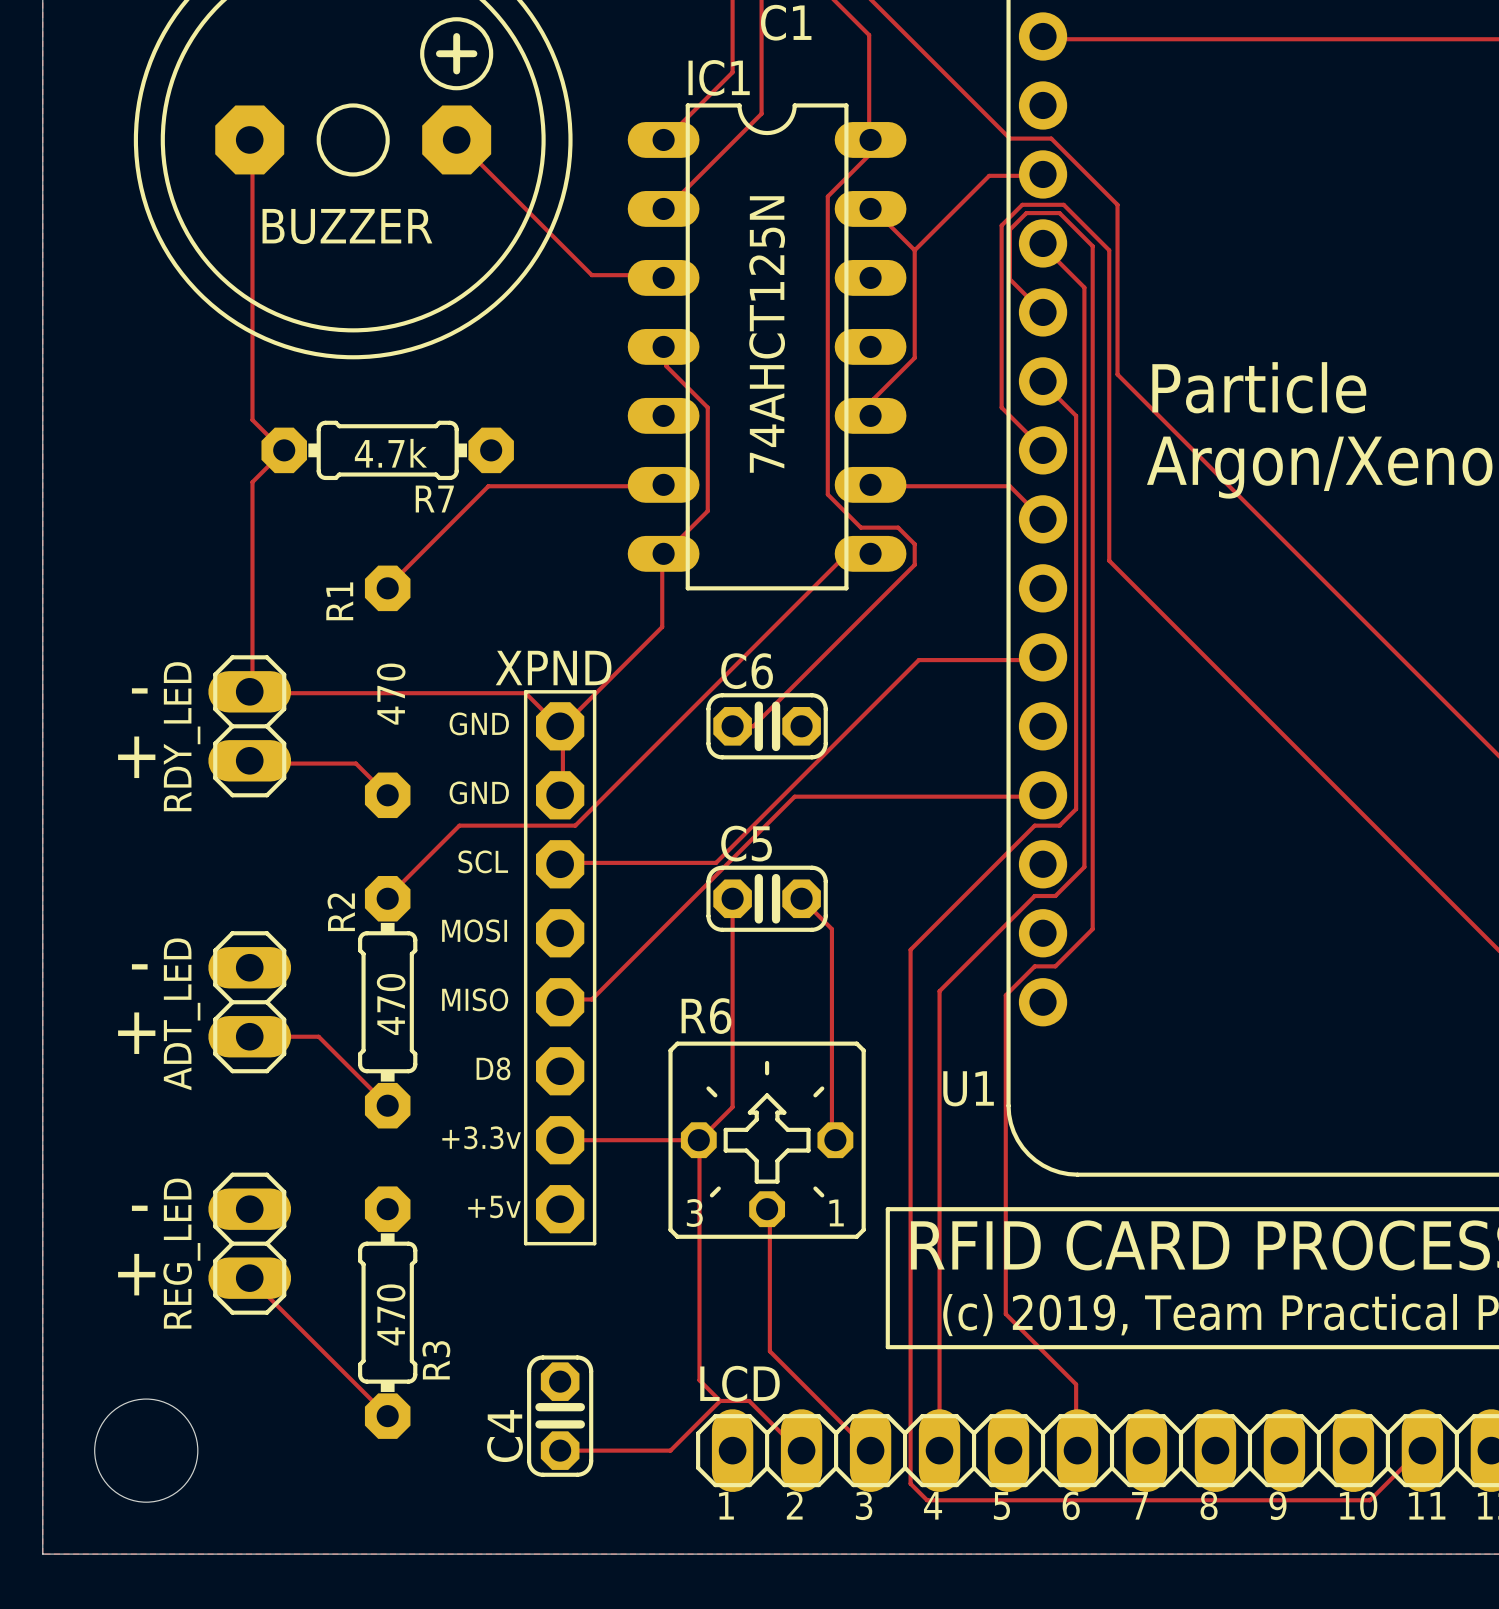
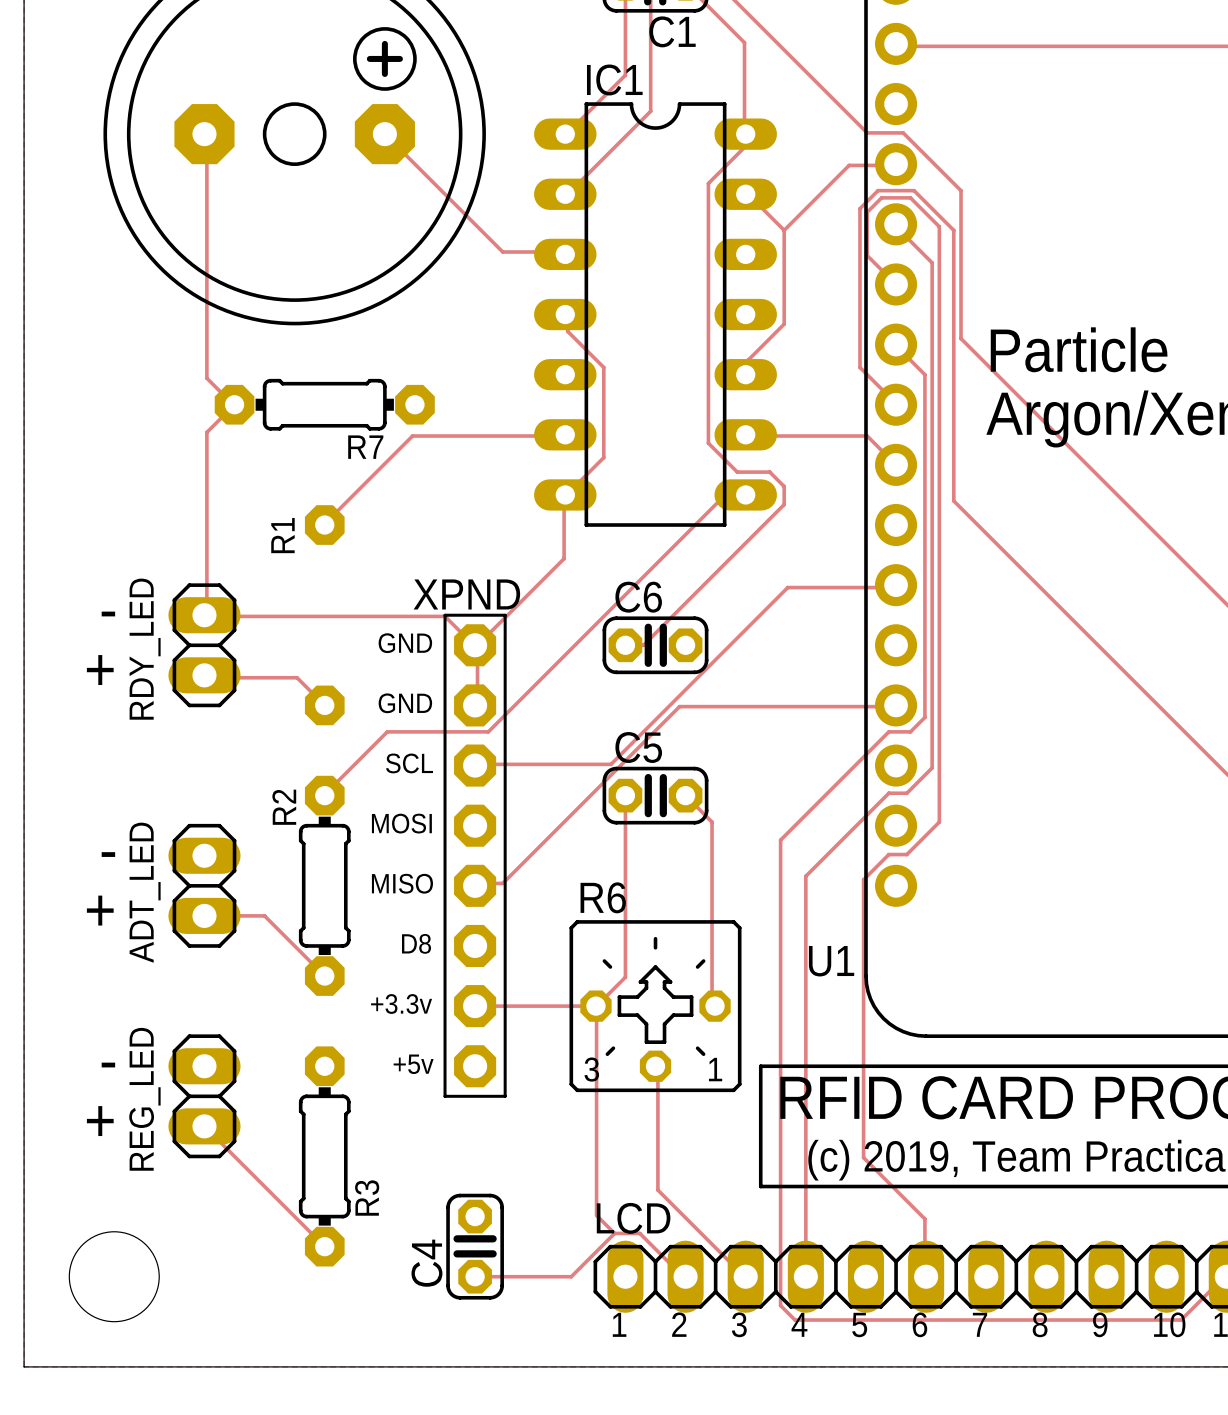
text: BUZZER (347, 226) -> none
text: 74AHCT125N (767, 334) -> none
text: 4.7k (390, 453) -> none
text: 470 (391, 694) -> none
text: 470 (391, 1004) -> none
text: 470 (391, 1314) -> none

